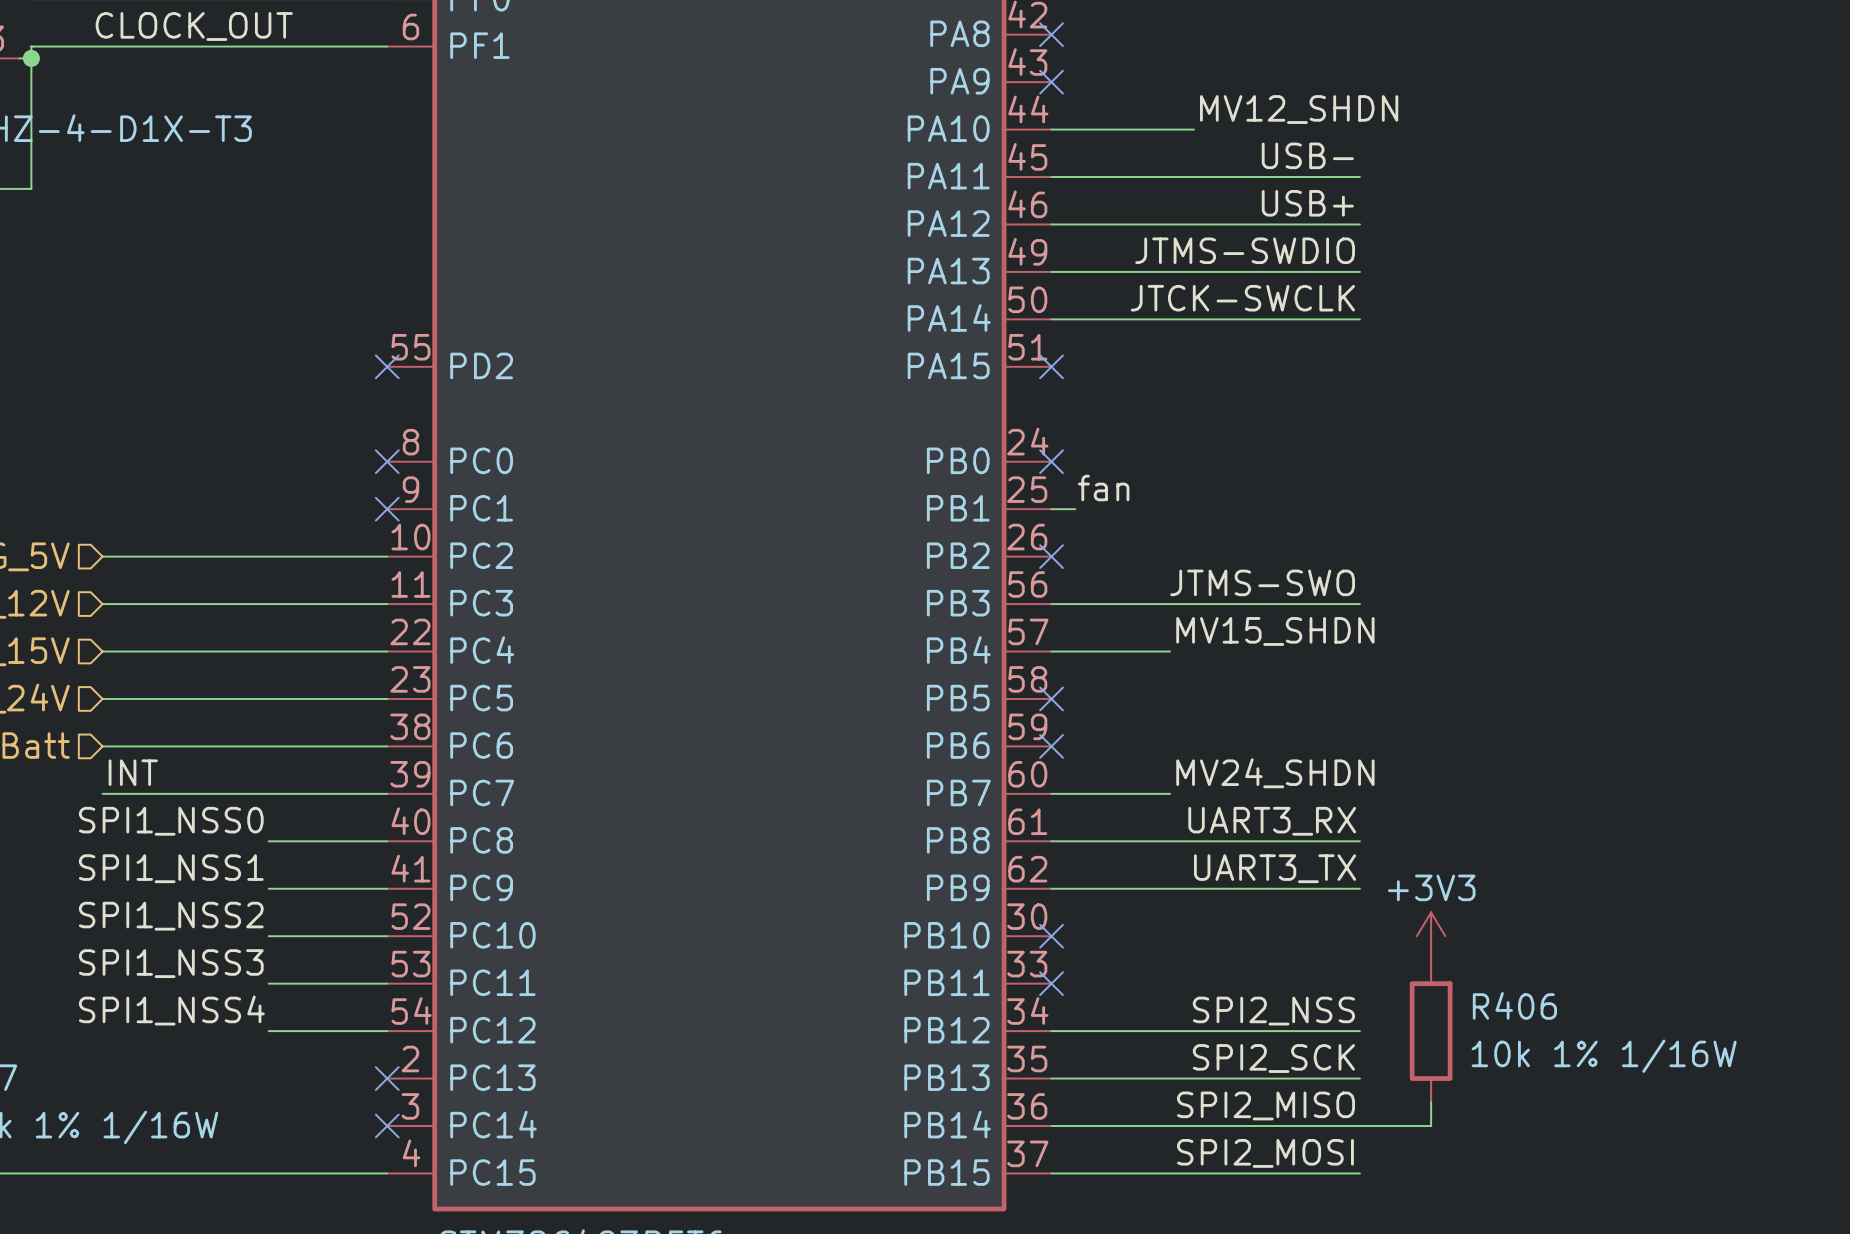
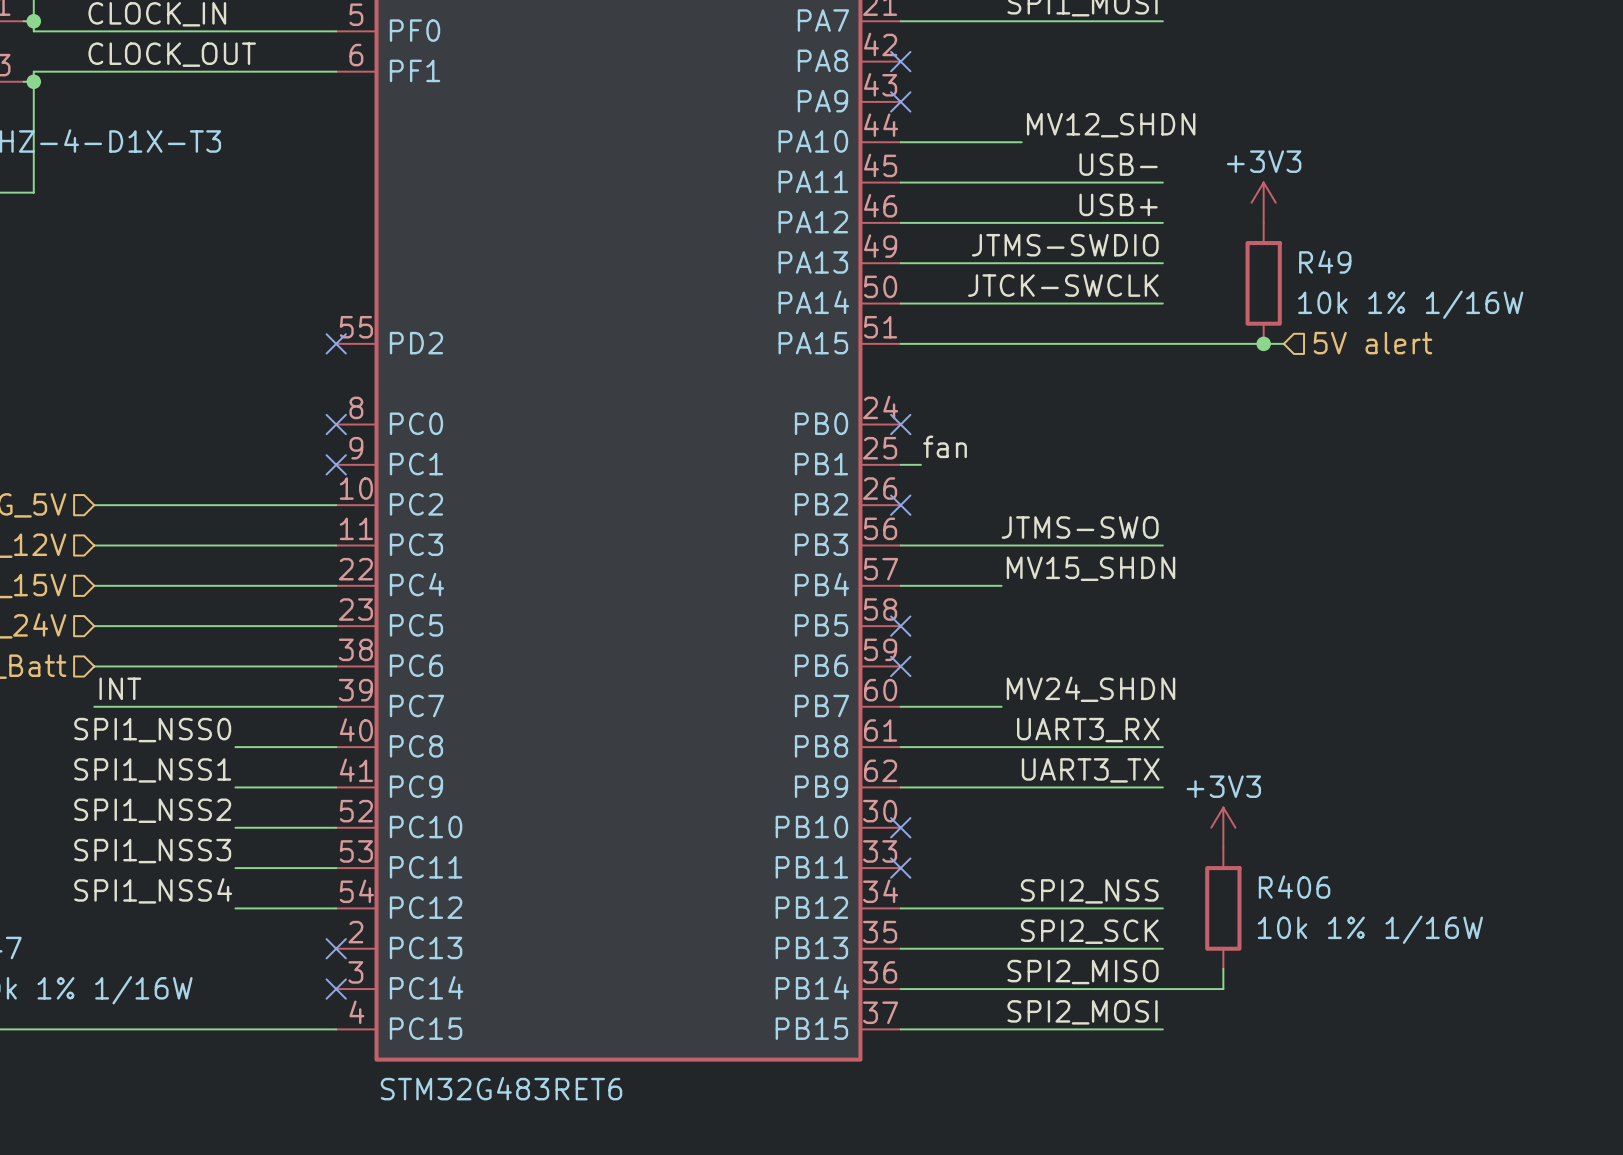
power symbol: none -> +3V3 (1263, 202)
R49: none -> 10k 1% 1/16W (1263, 283)
hierarchical label: none -> 5V alert (1372, 343)
wire: none -> (900, 343) (1283, 343)
no-connect mark: (1051, 366) -> none
junction: none -> (1263, 343)

